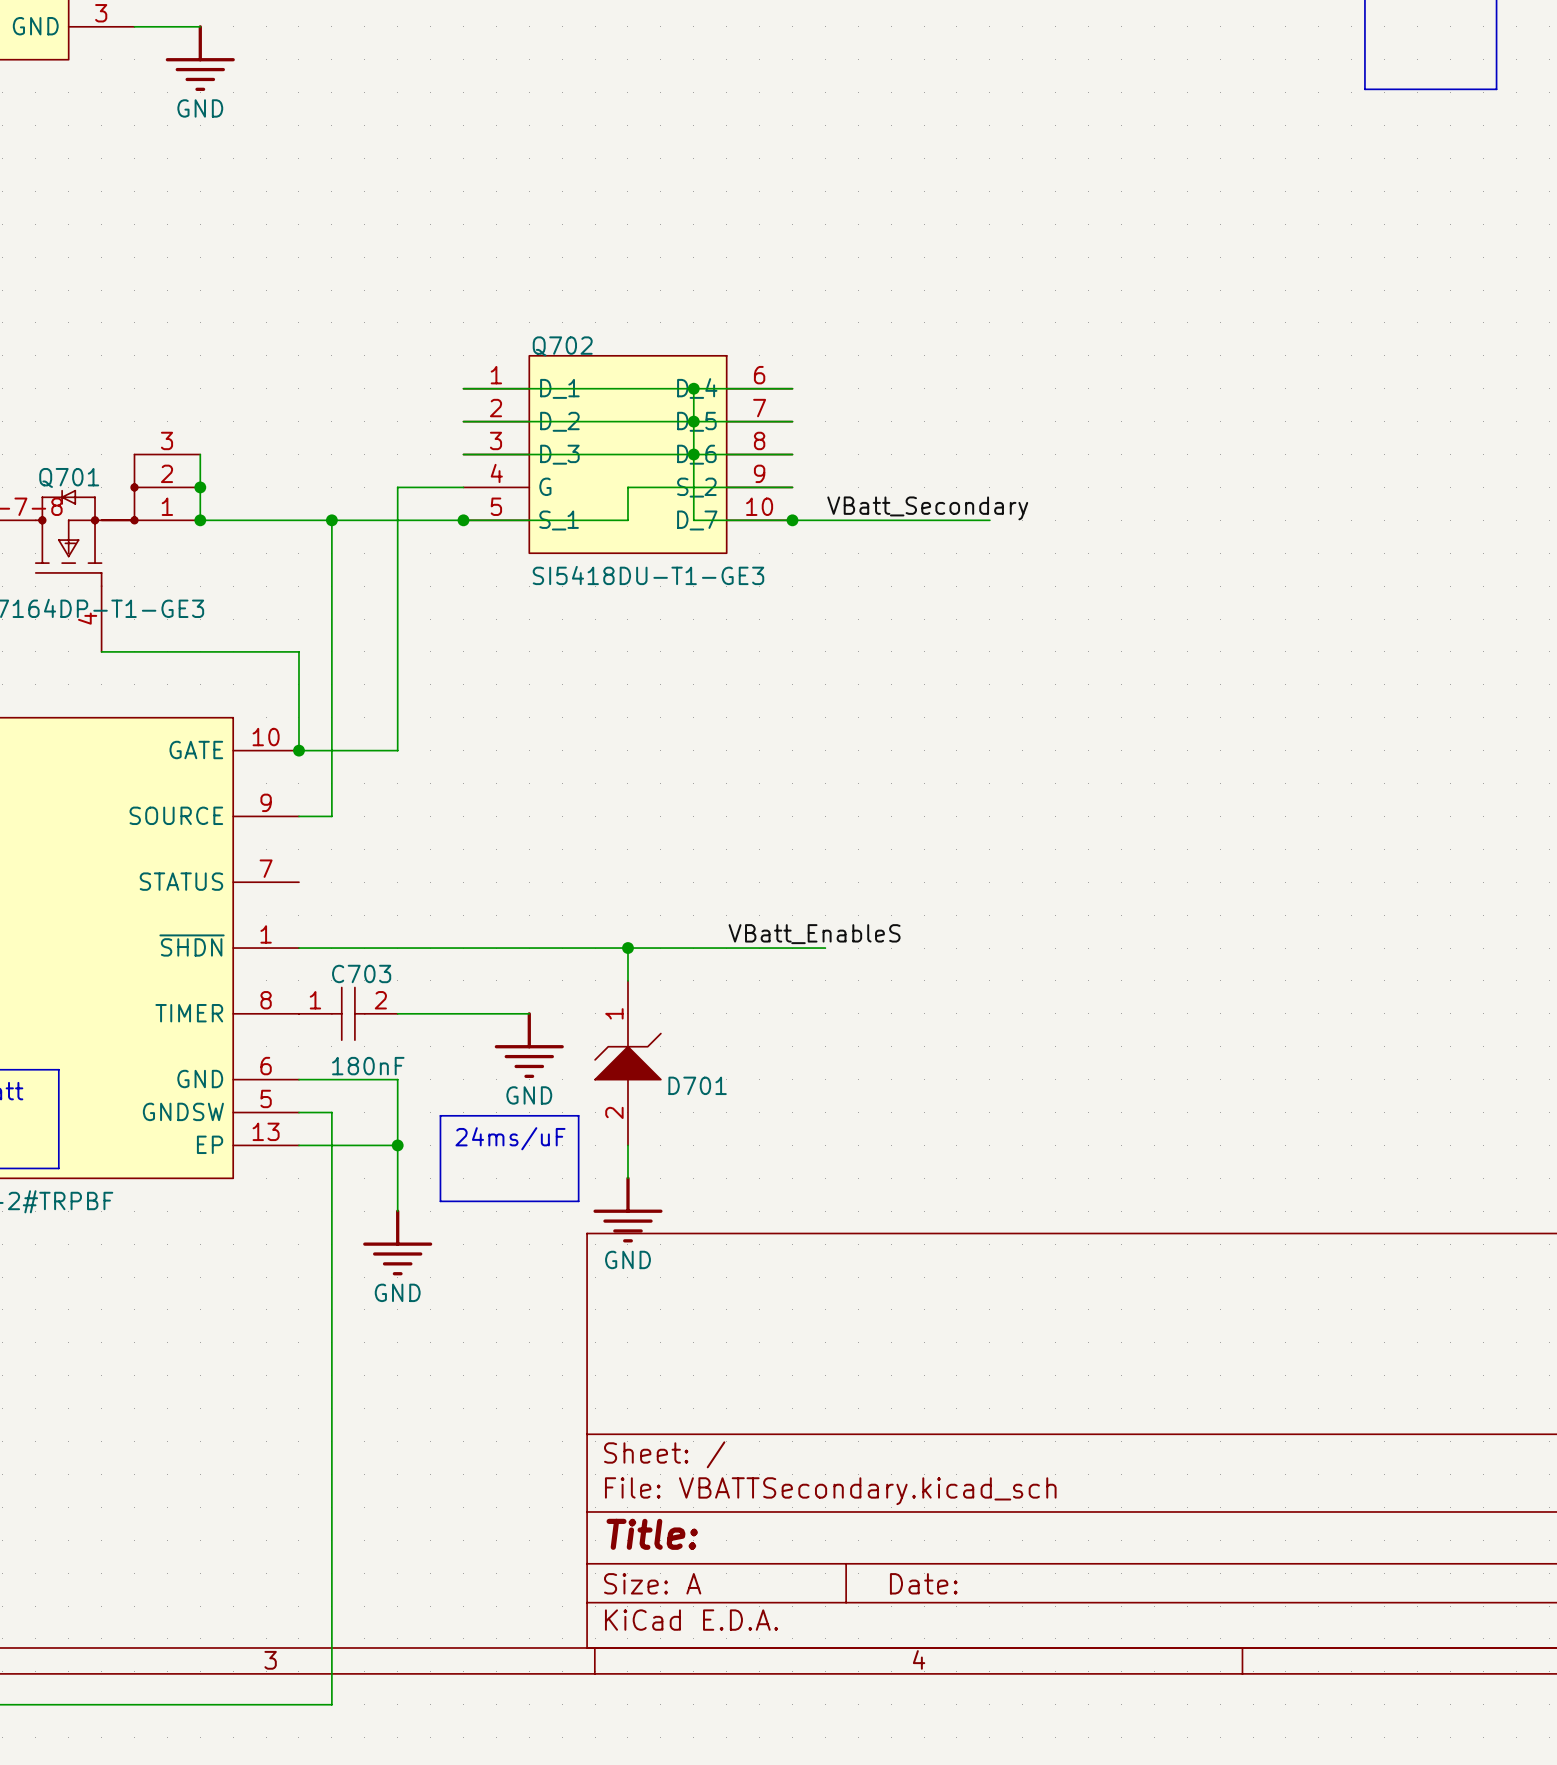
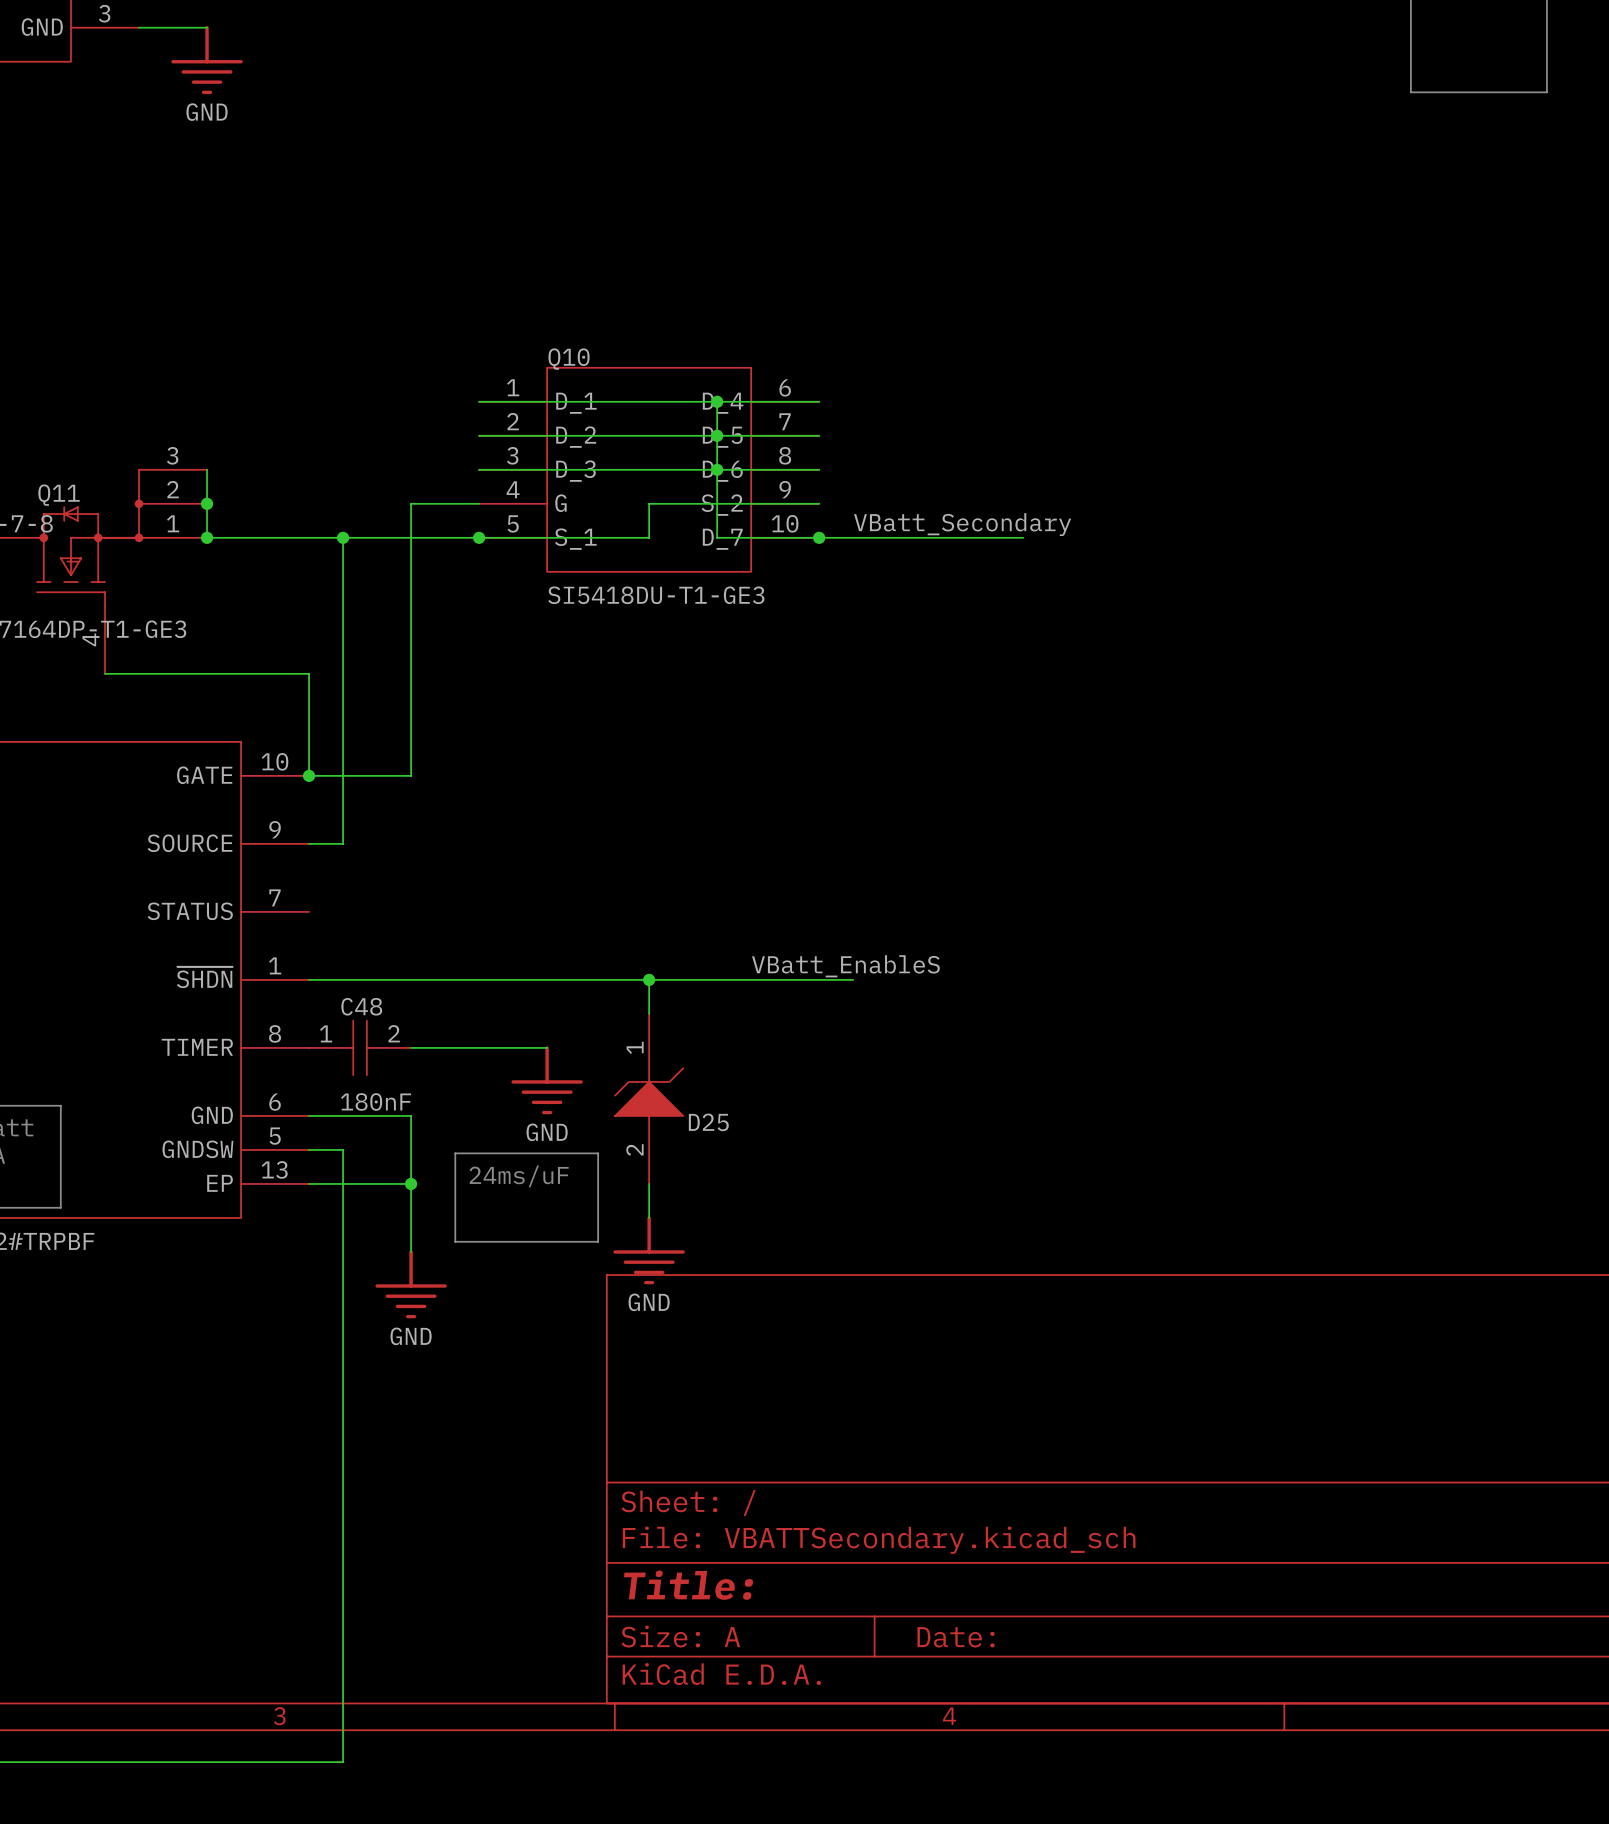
Q702 name: Q702 (562, 346) -> Q10 (569, 359)
Q701 name: Q701 (69, 477) -> Q11 (59, 495)
C703 name: C703 (361, 973) -> C48 (361, 1006)
D701 name: D701 (697, 1085) -> D25 (708, 1122)

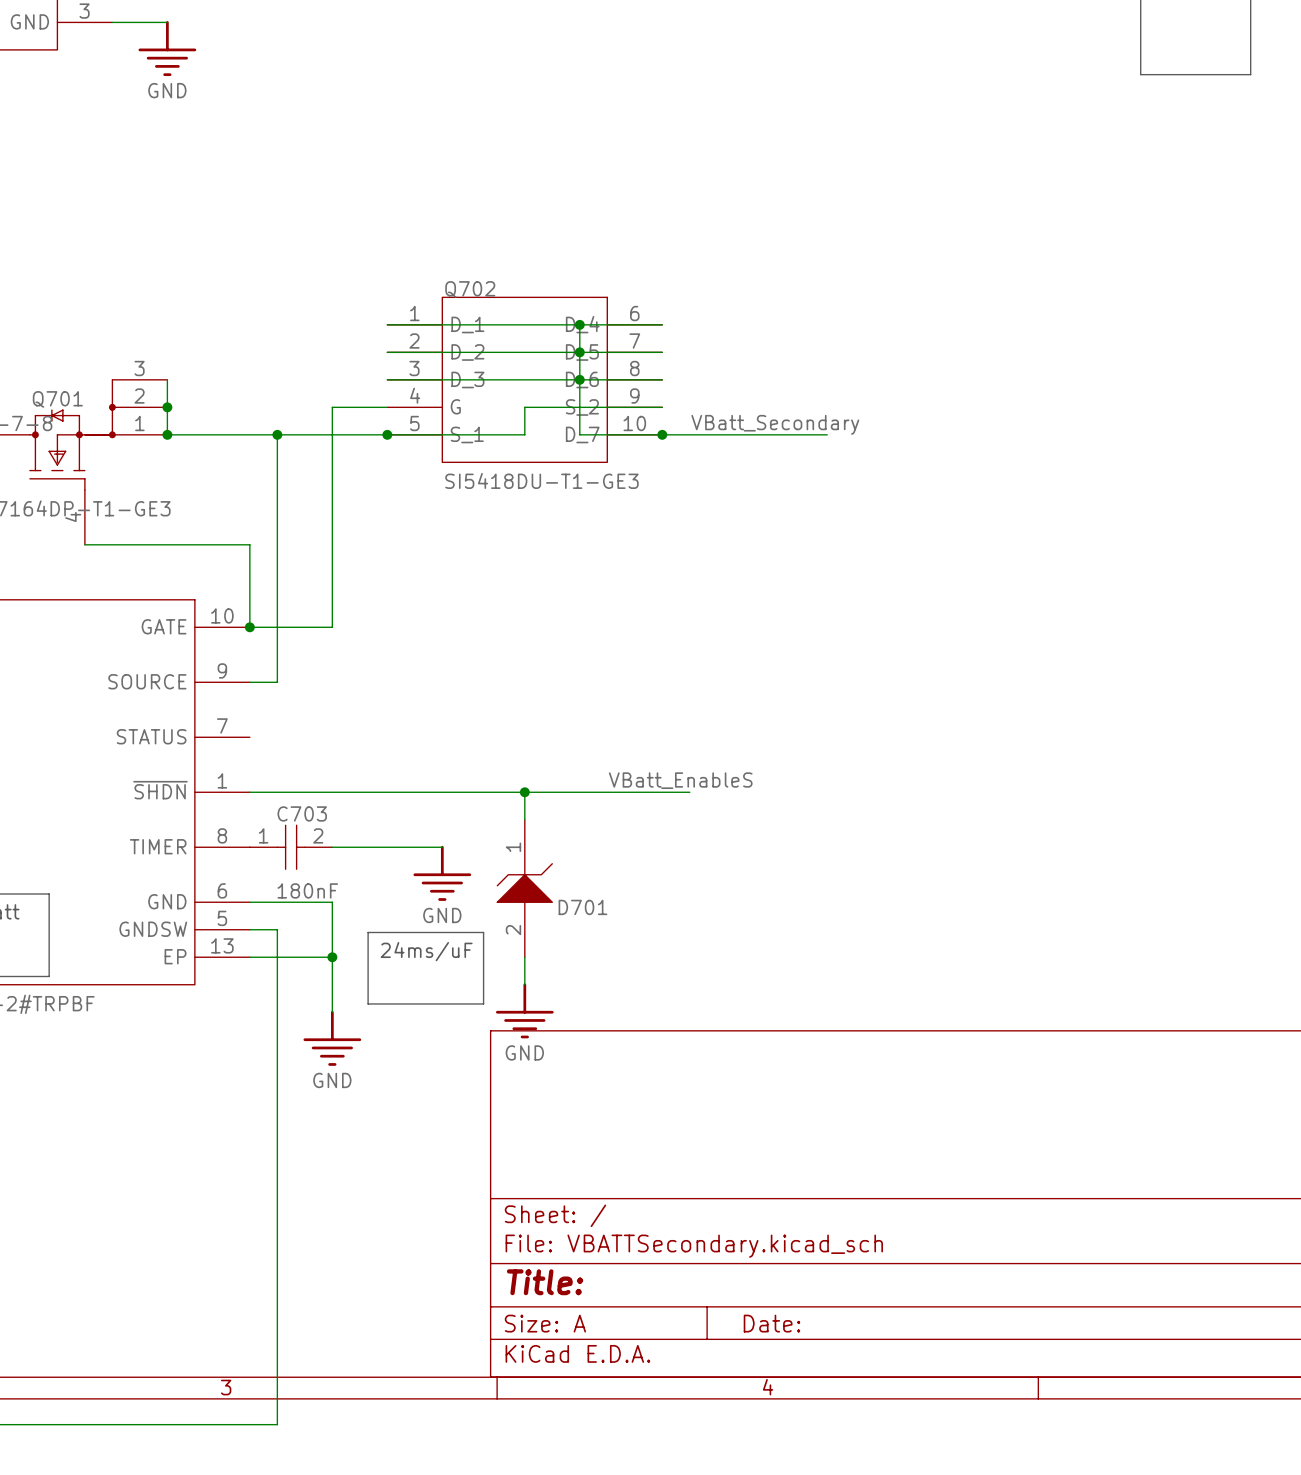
Q10 name: Q10 (569, 359) -> Q702 (470, 289)
Q11 name: Q11 (59, 495) -> Q701 (57, 399)
C48 name: C48 (361, 1006) -> C703 (302, 813)
D25 name: D25 (708, 1122) -> D701 (582, 907)

